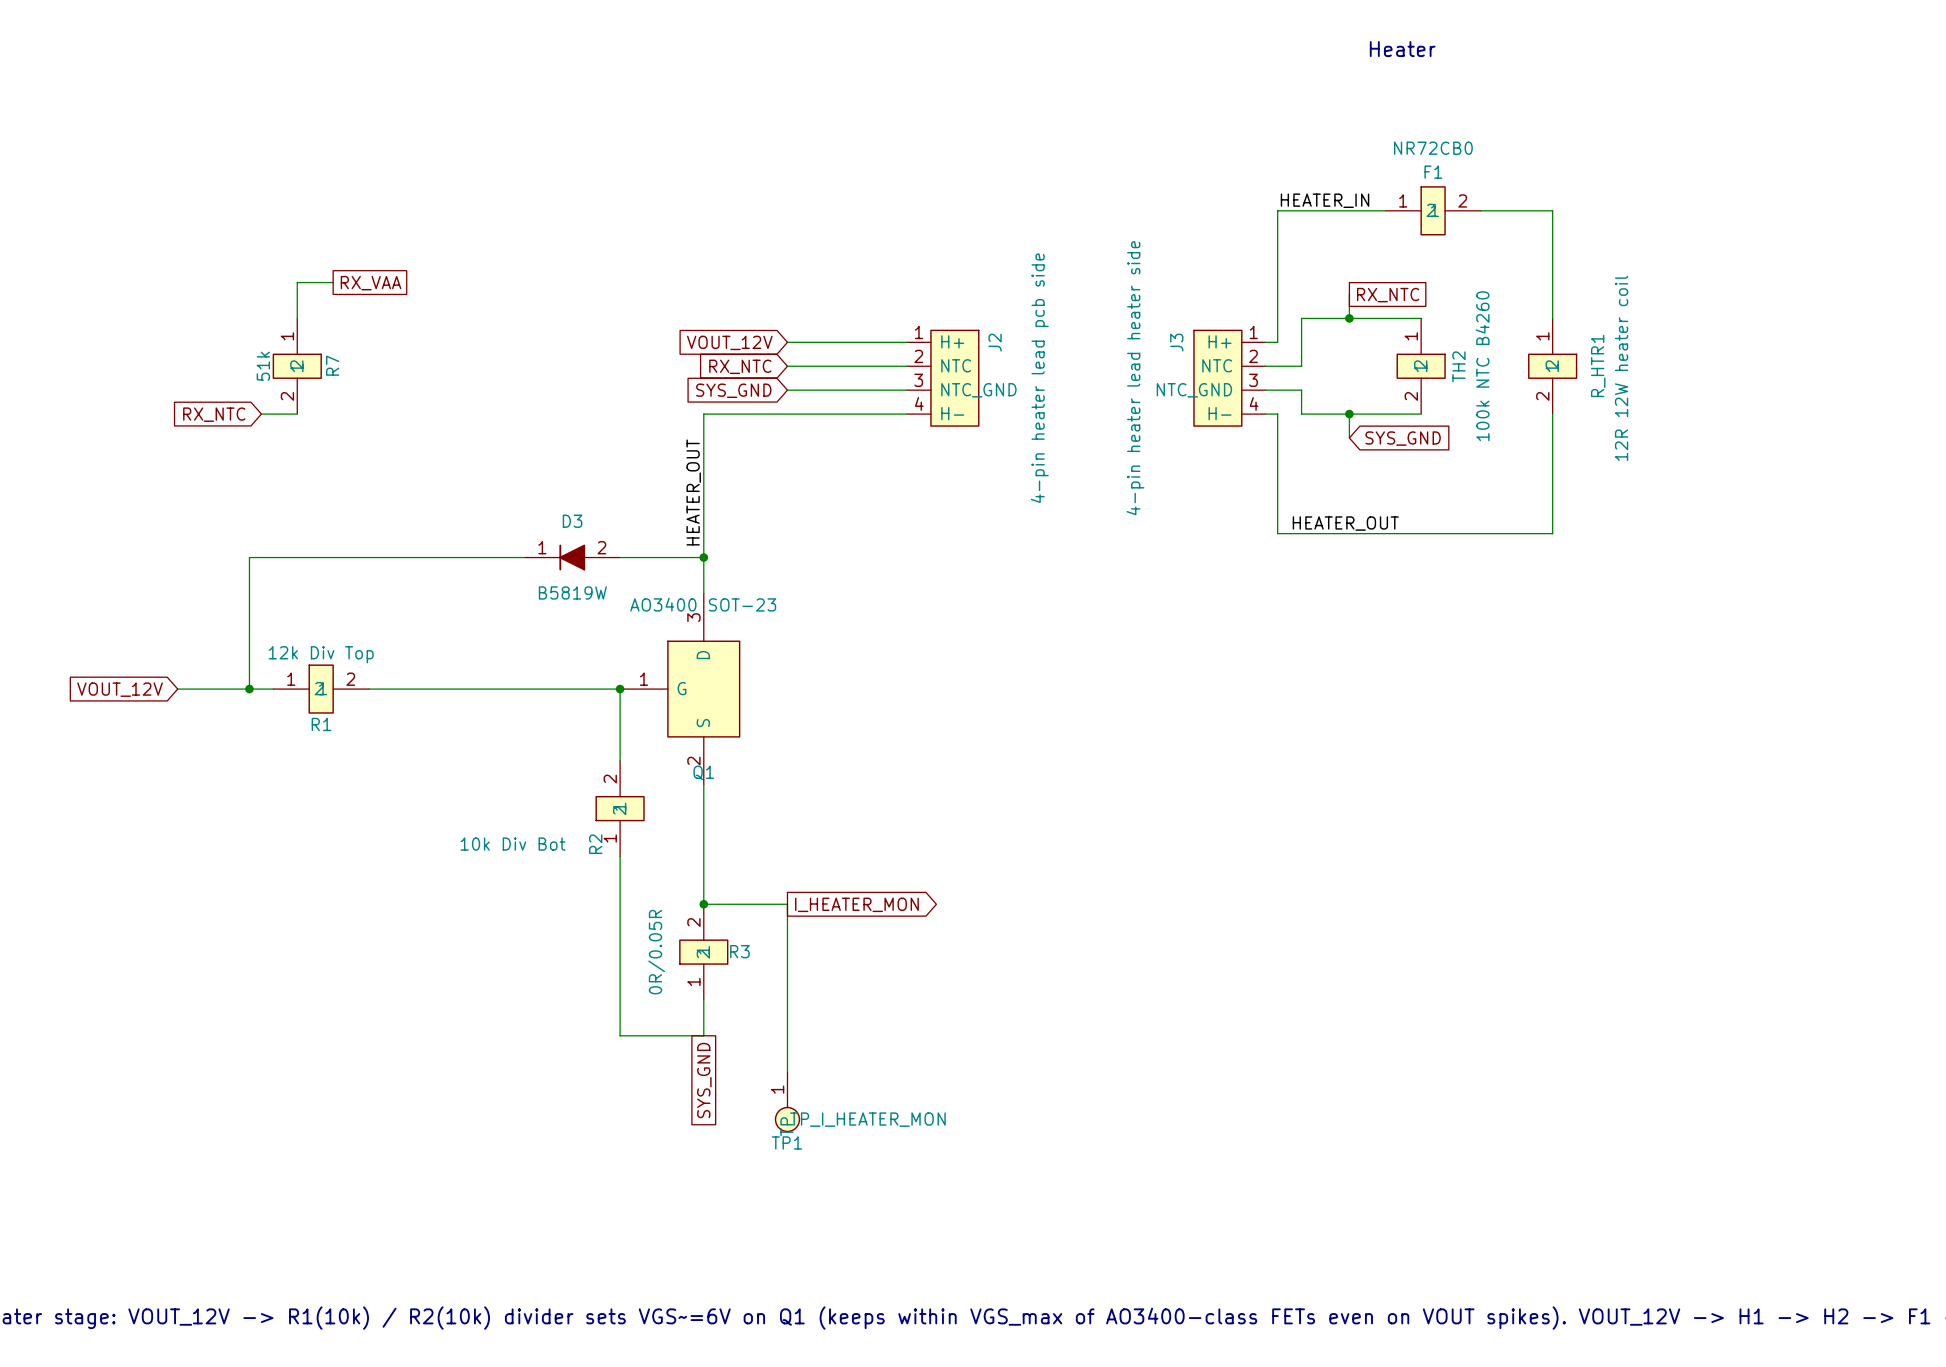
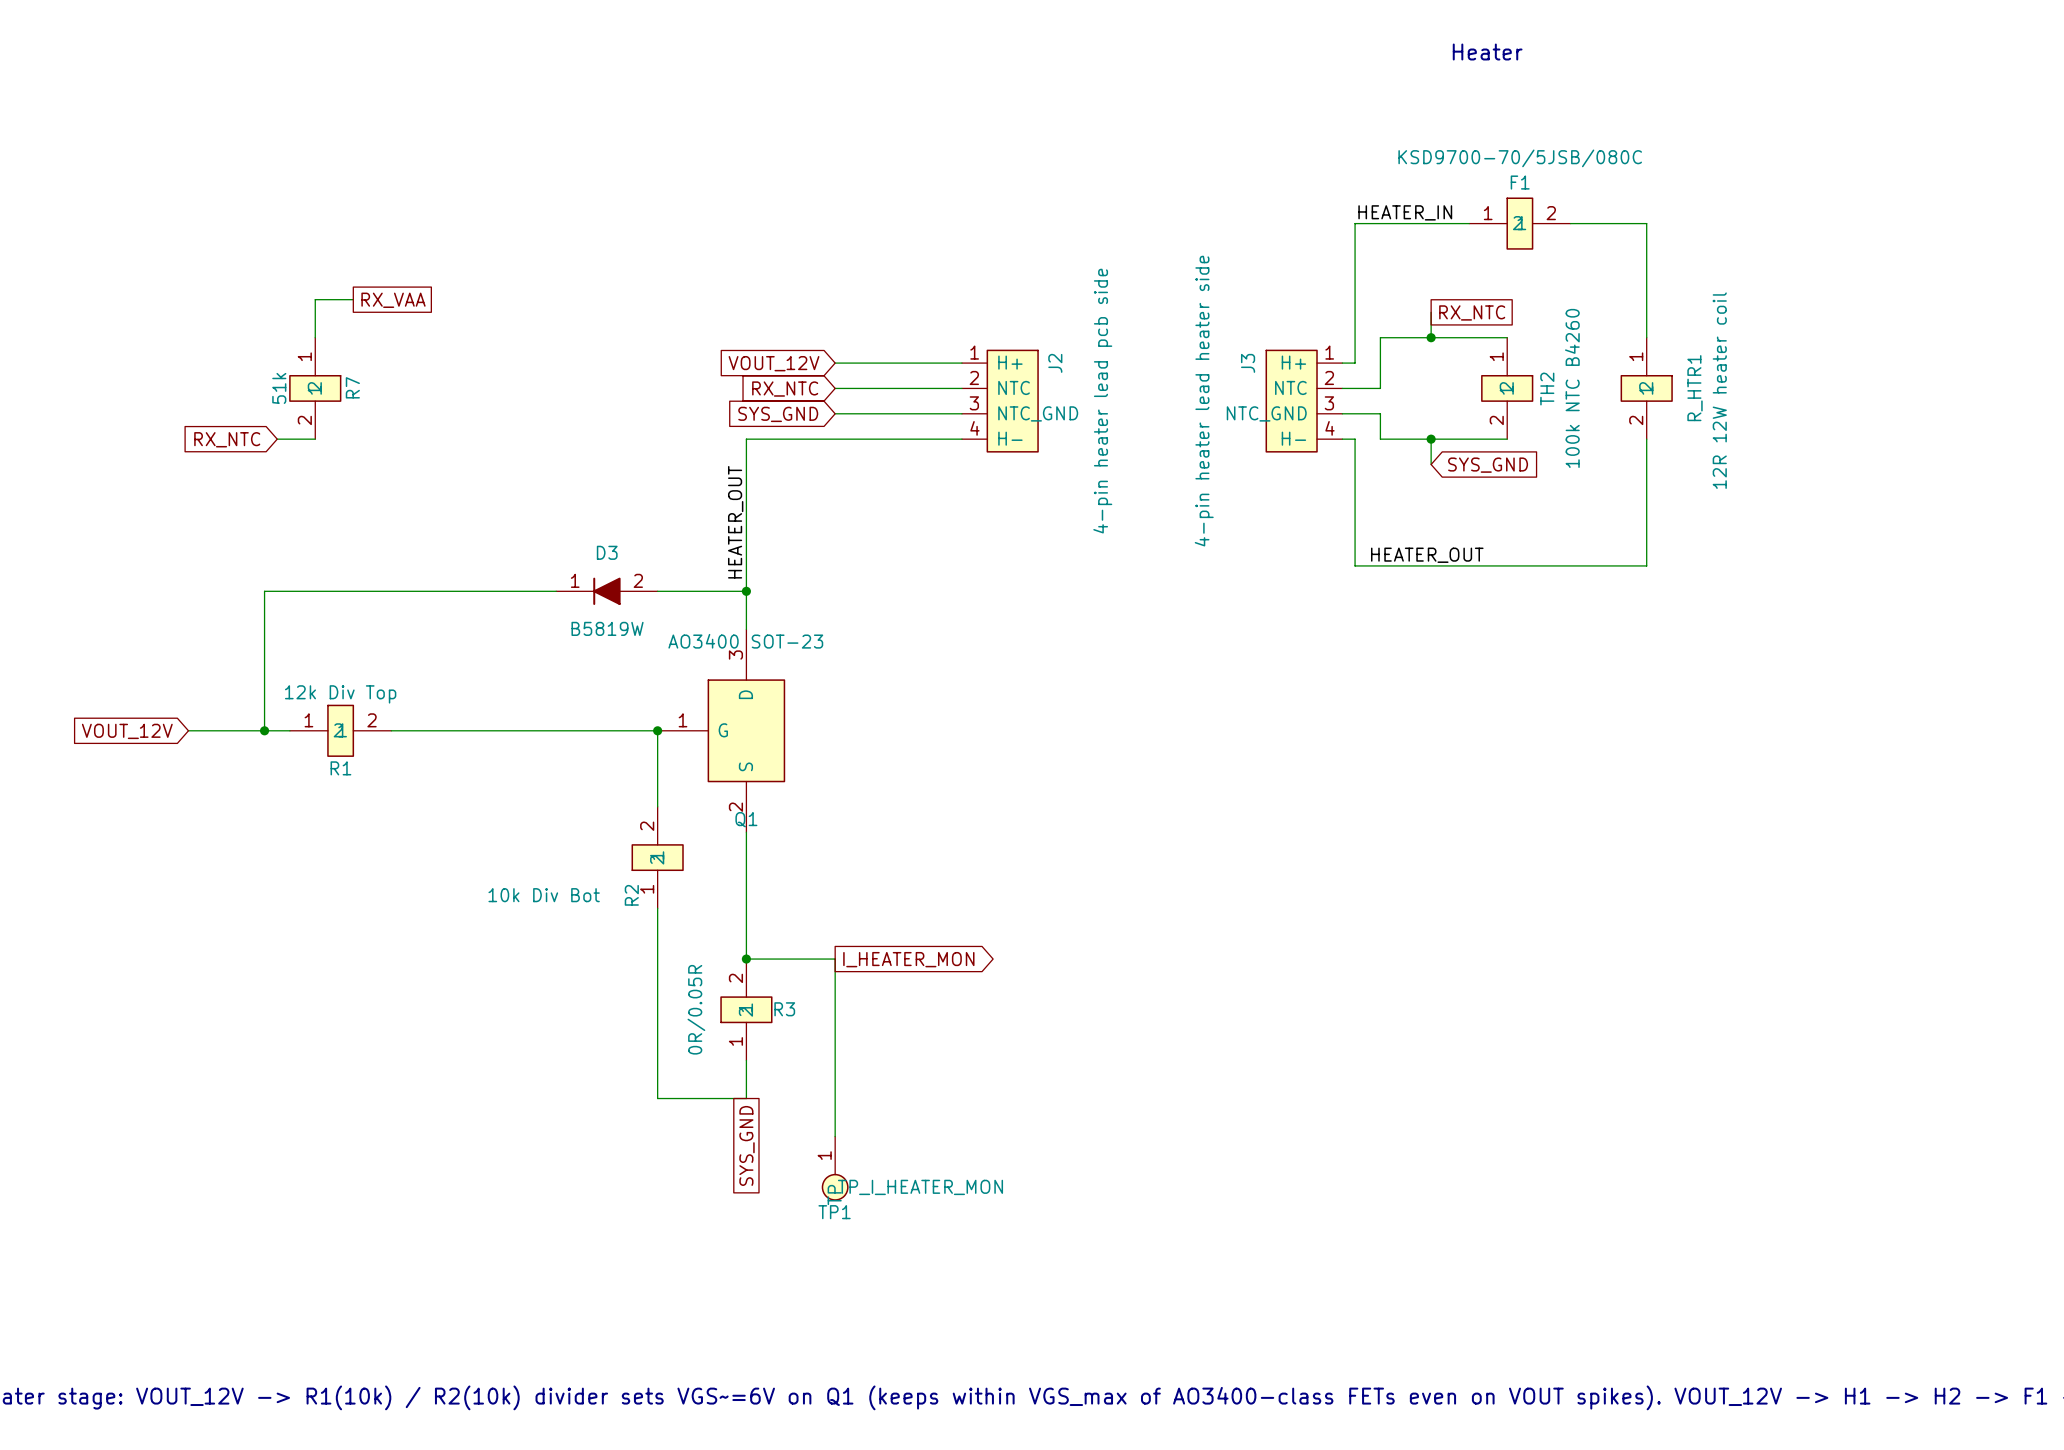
F1 value: NR72CB0 (1433, 148) -> KSD9700-70/5JSB/080C (1520, 158)

